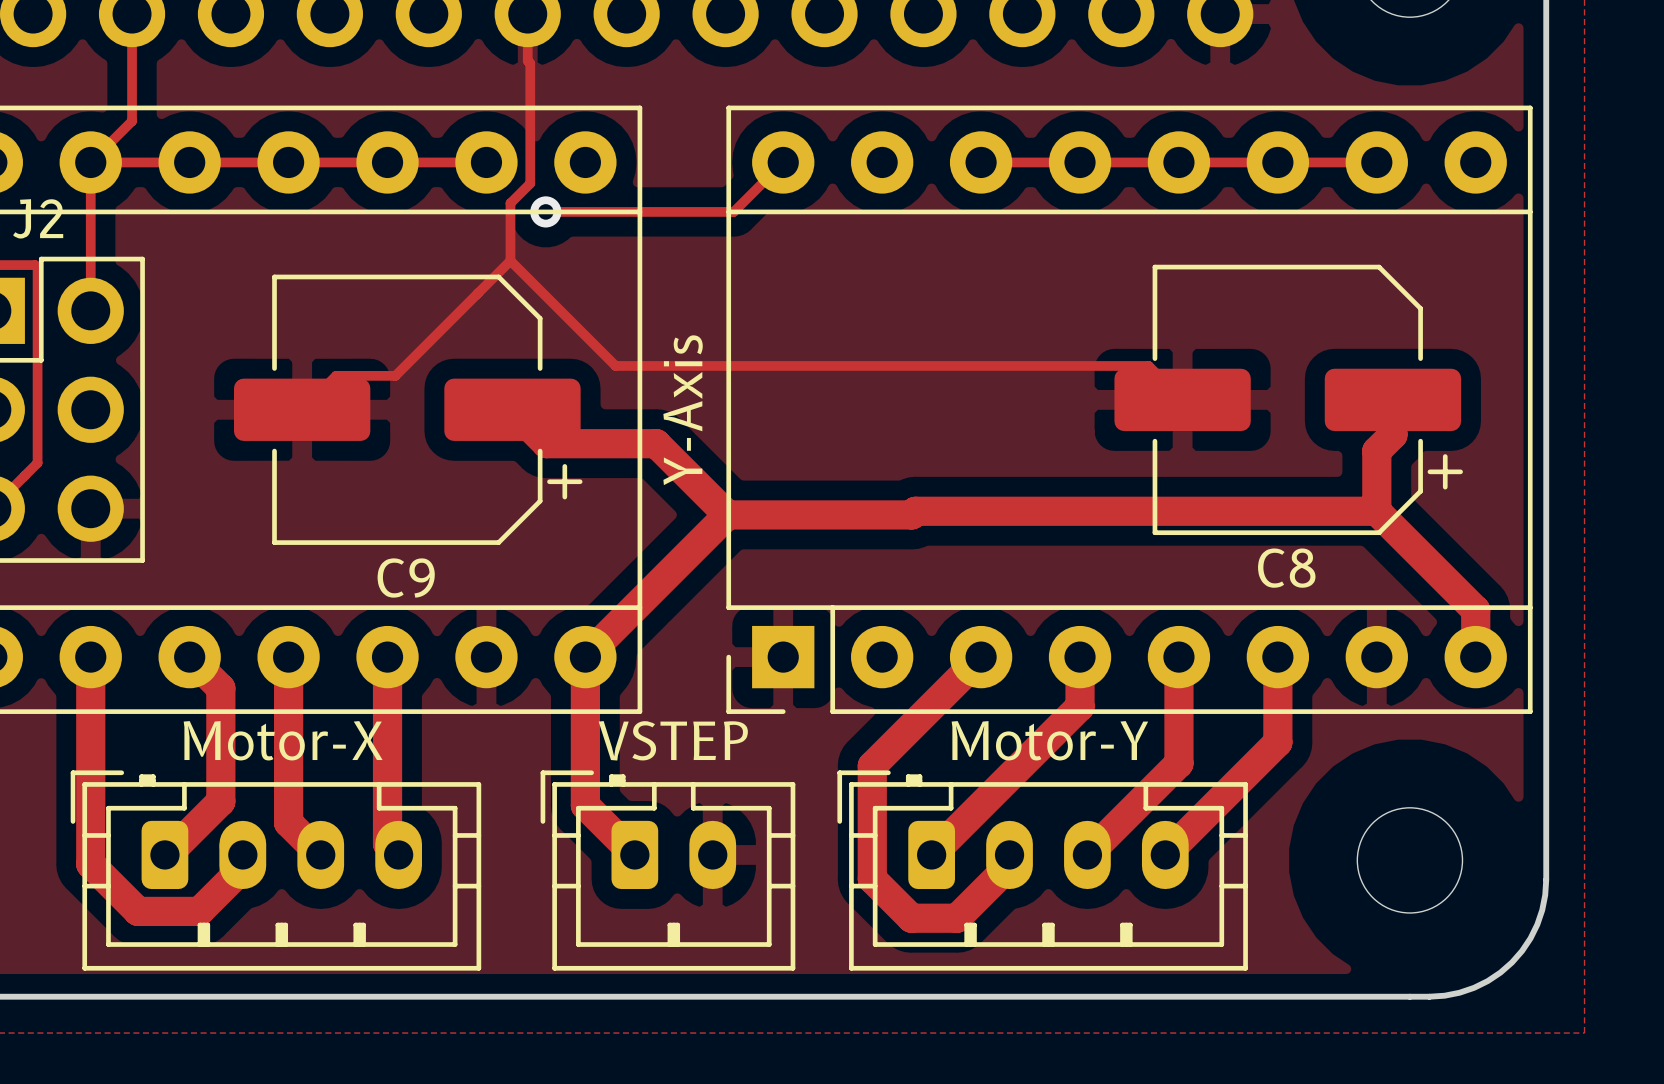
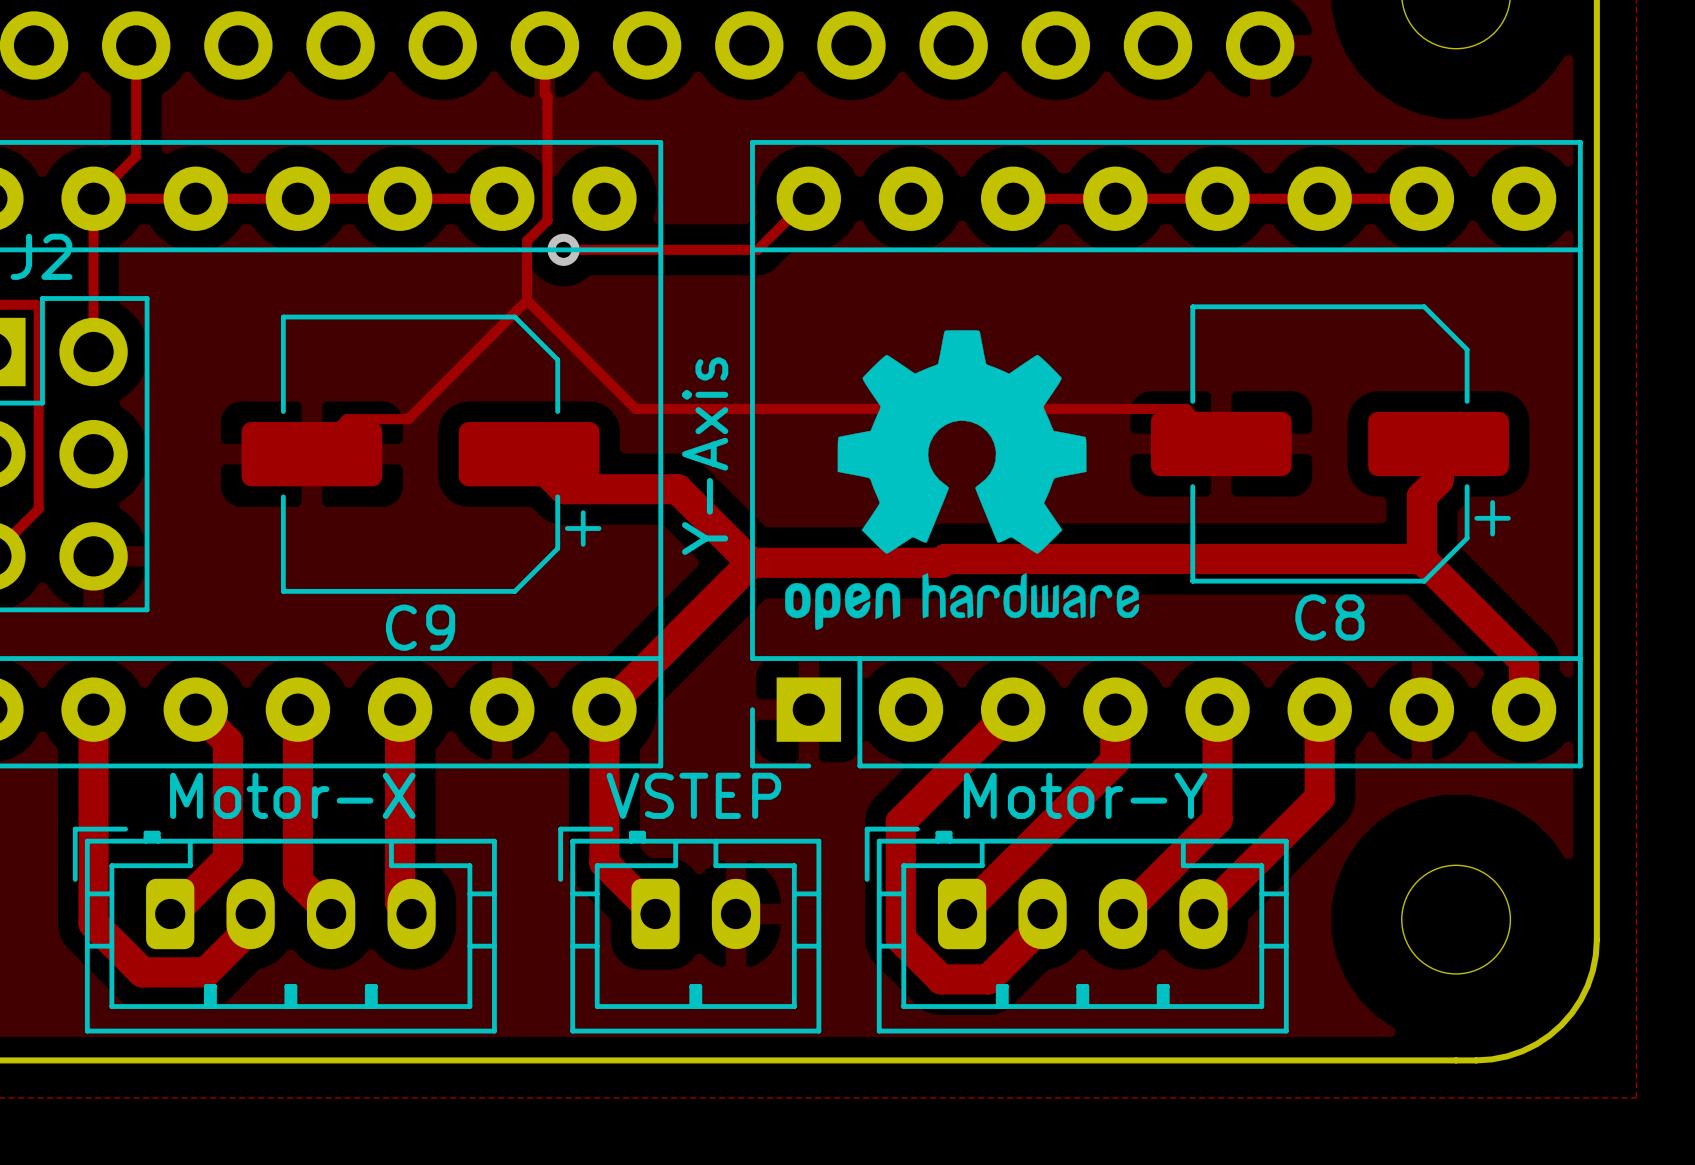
drawing: none -> [785, 330, 1140, 631]

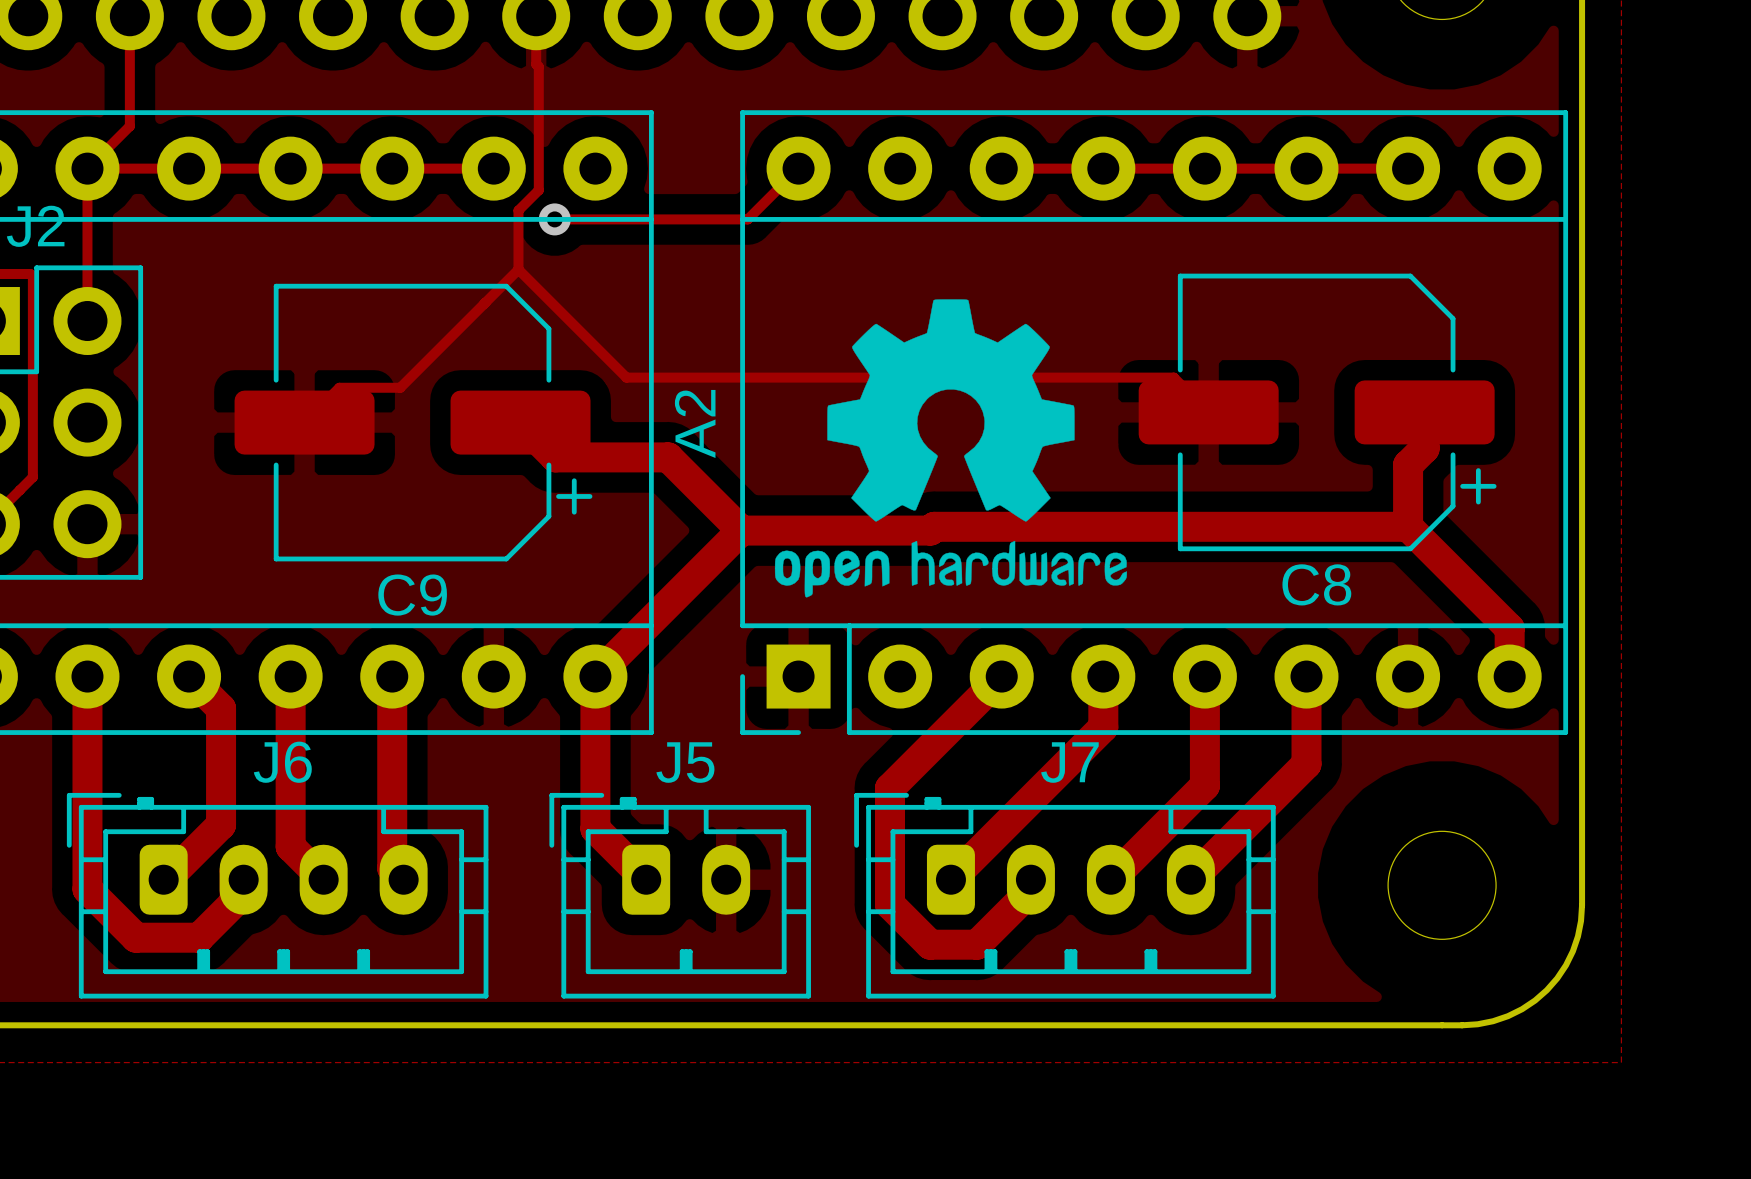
Y-Axis name: Y-Axis (705, 456) -> A2 (695, 423)
Motor-X name: Motor-X (292, 795) -> J6 (282, 762)
VSTEP name: VSTEP (693, 795) -> J5 (685, 762)
Motor-Y name: Motor-Y (1085, 795) -> J7 (1069, 762)

